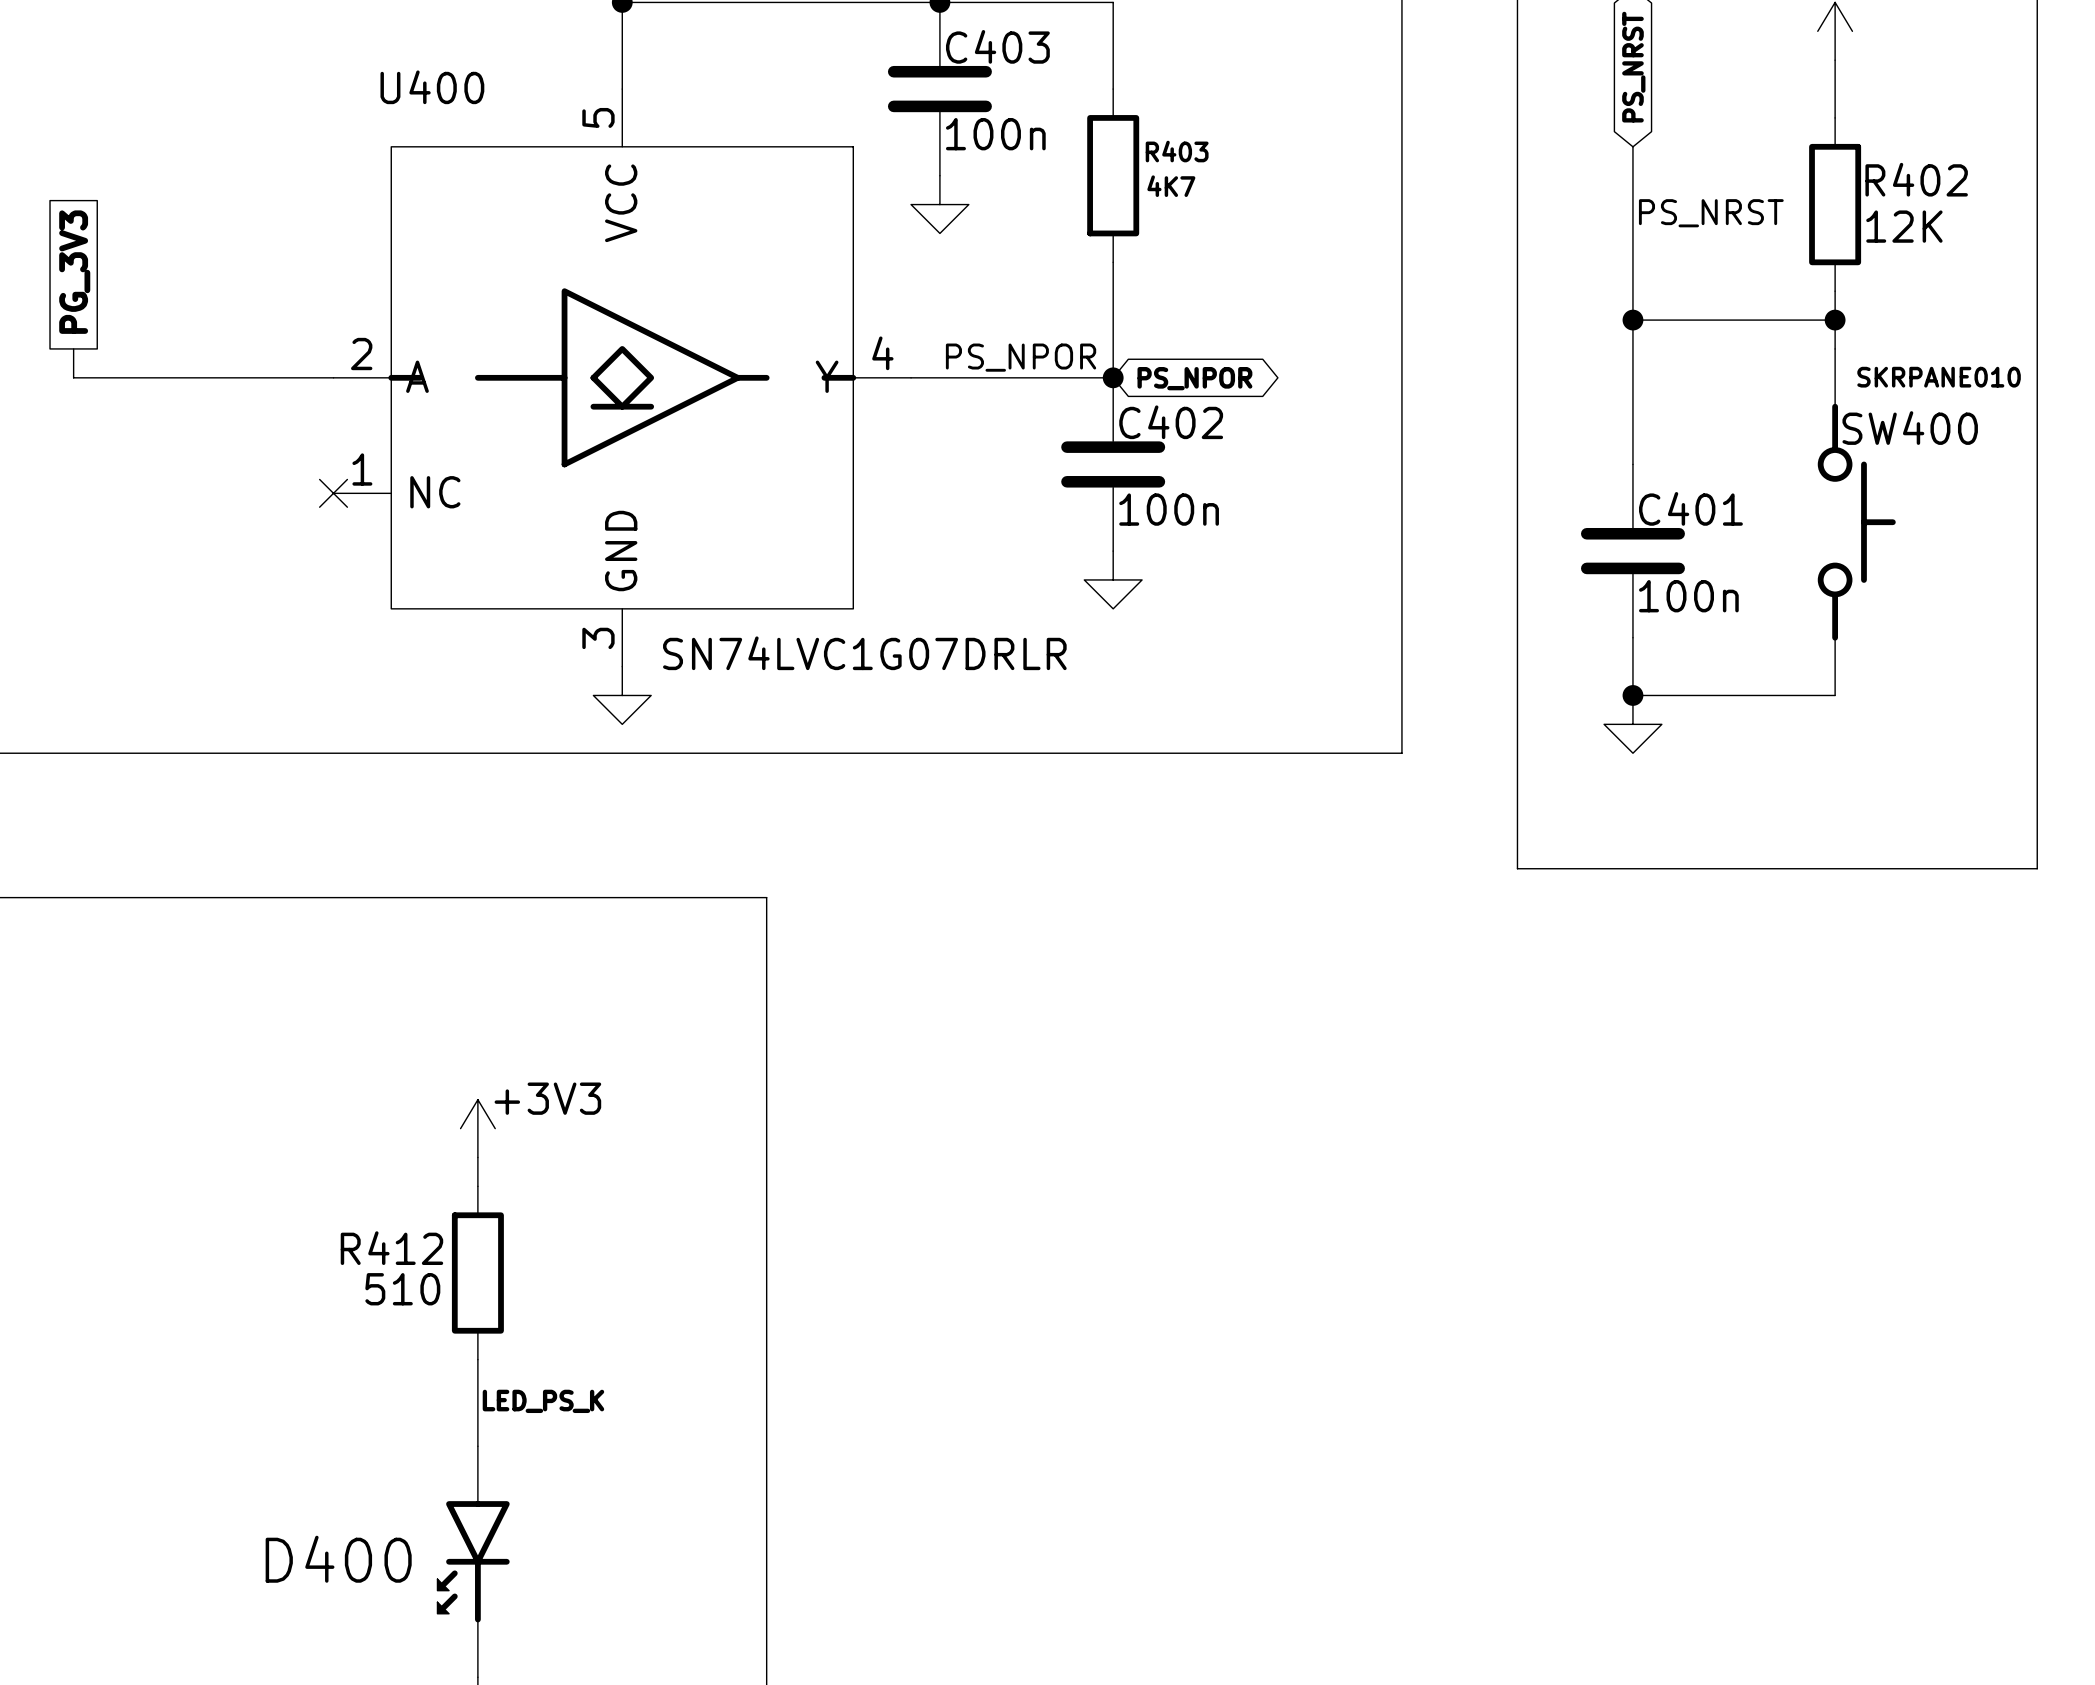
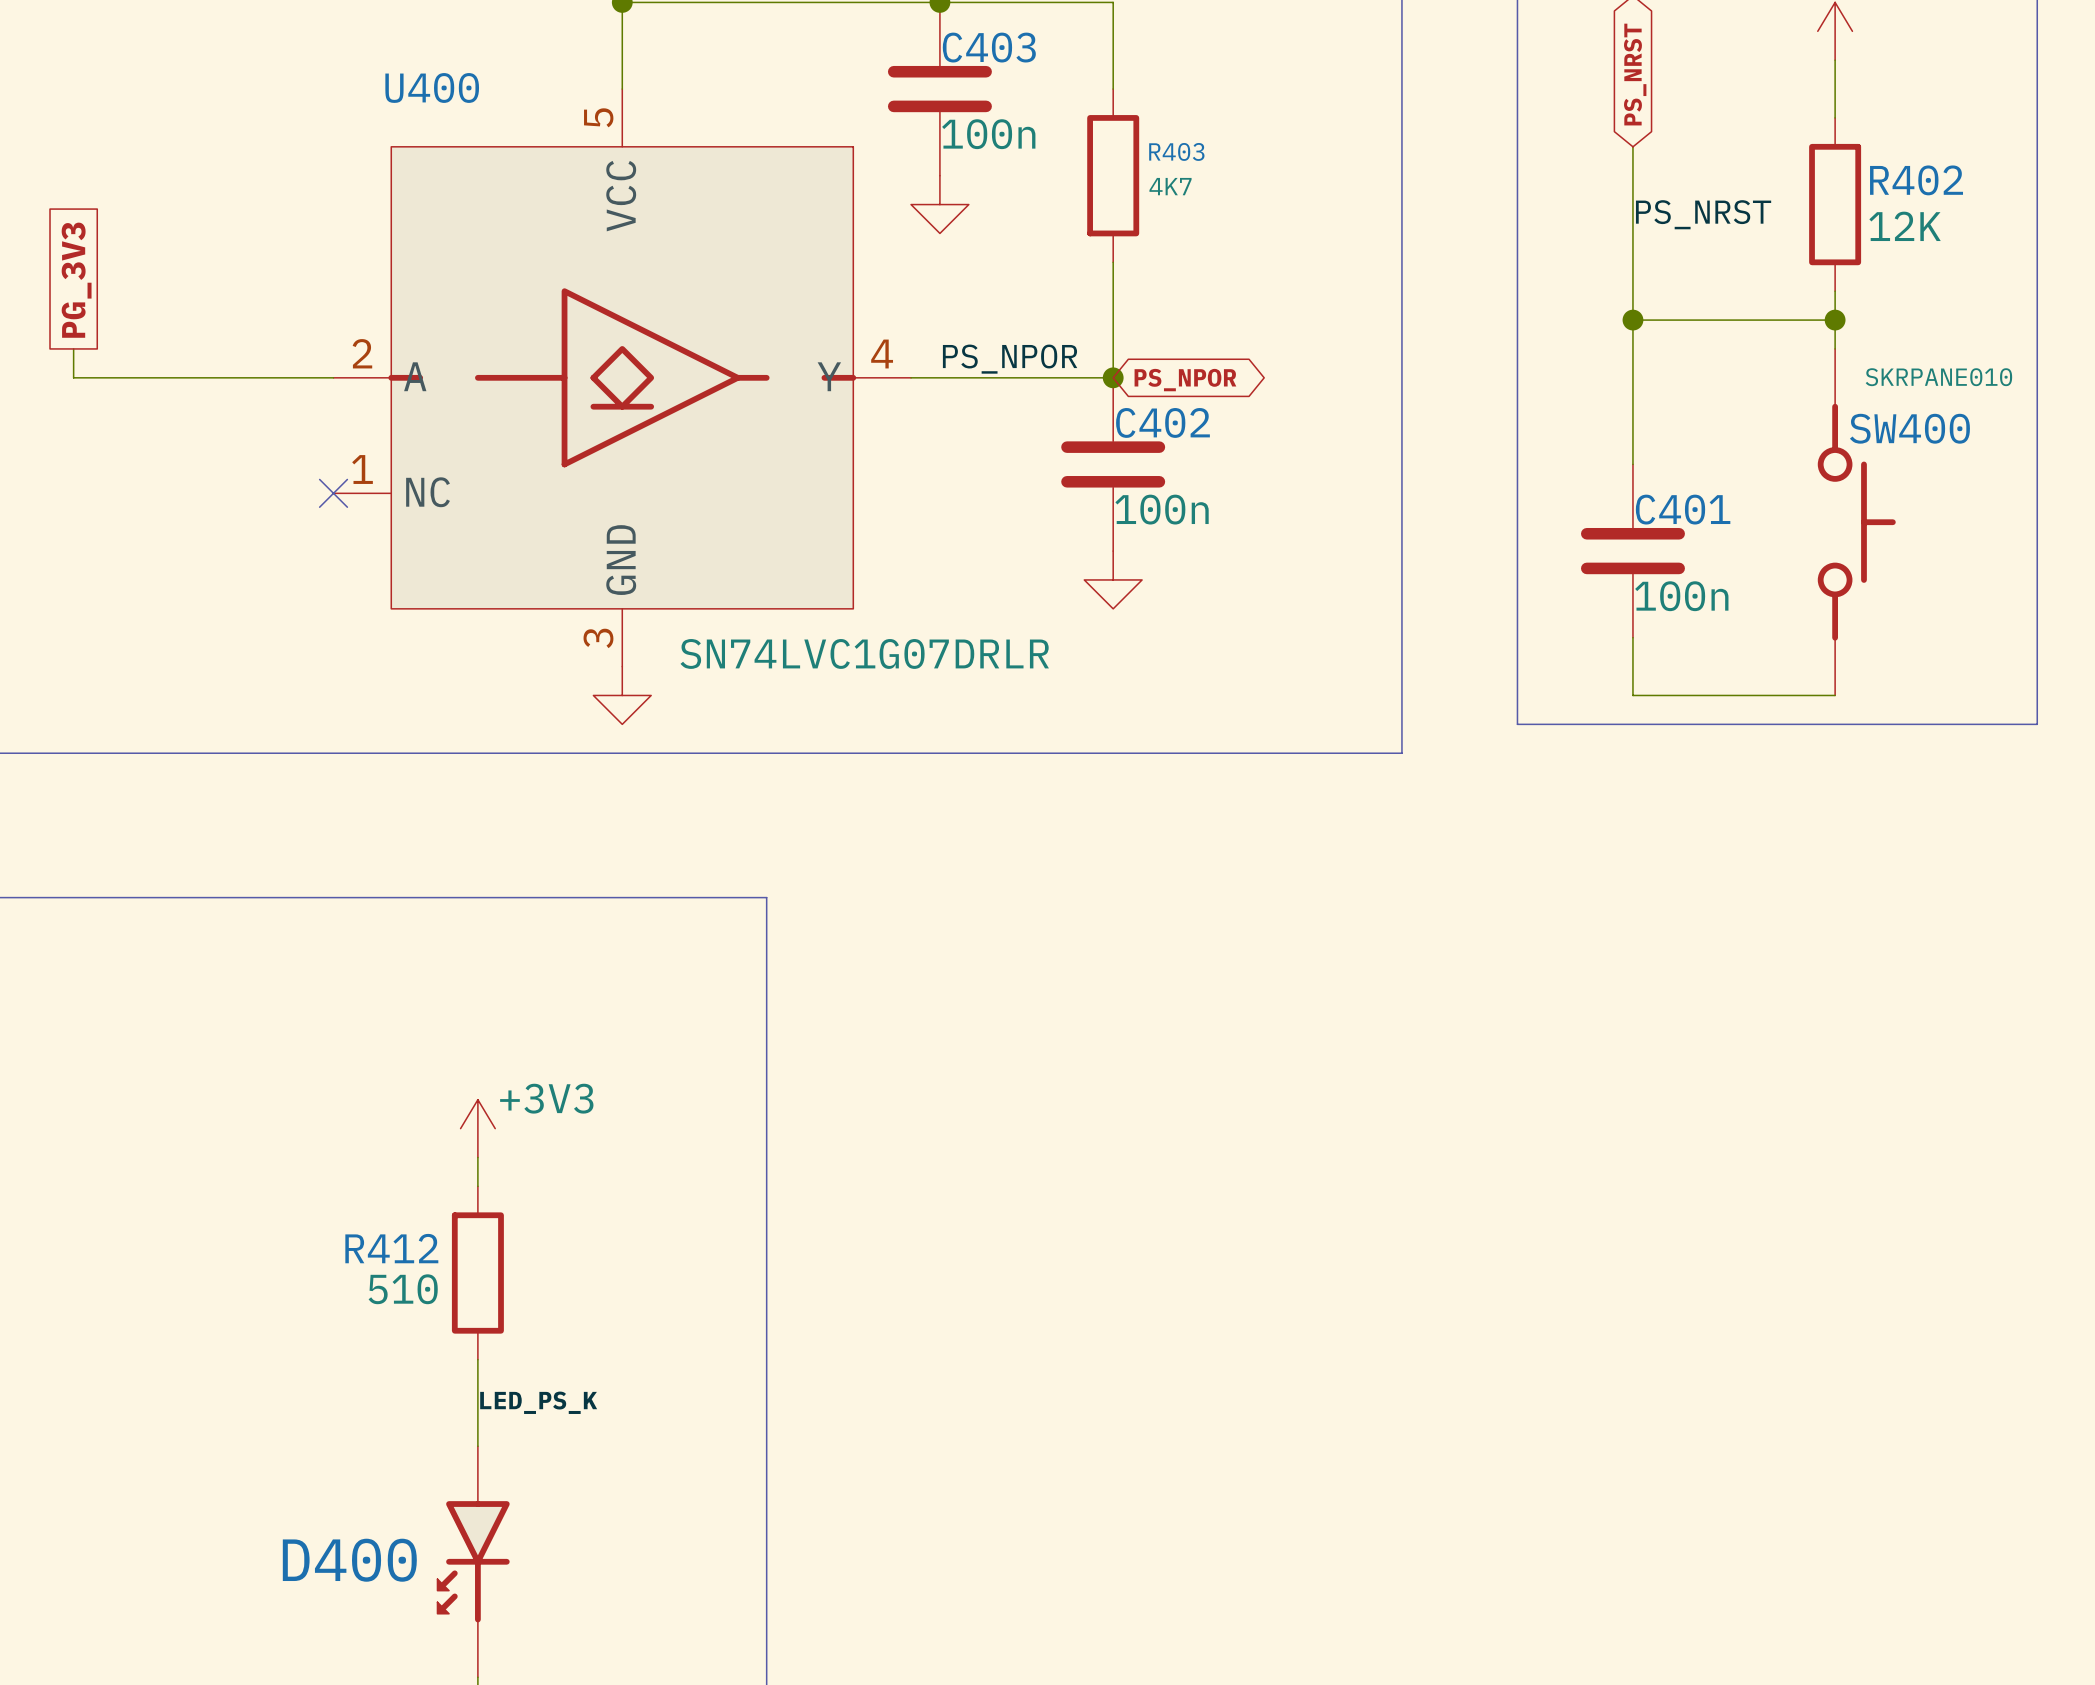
junction: (1632, 695) -> none
line: (1517, 724) (1517, 868) (2037, 868) (2037, 724) -> (1517, 724) (2037, 724)
power symbol: (1632, 724) -> none

